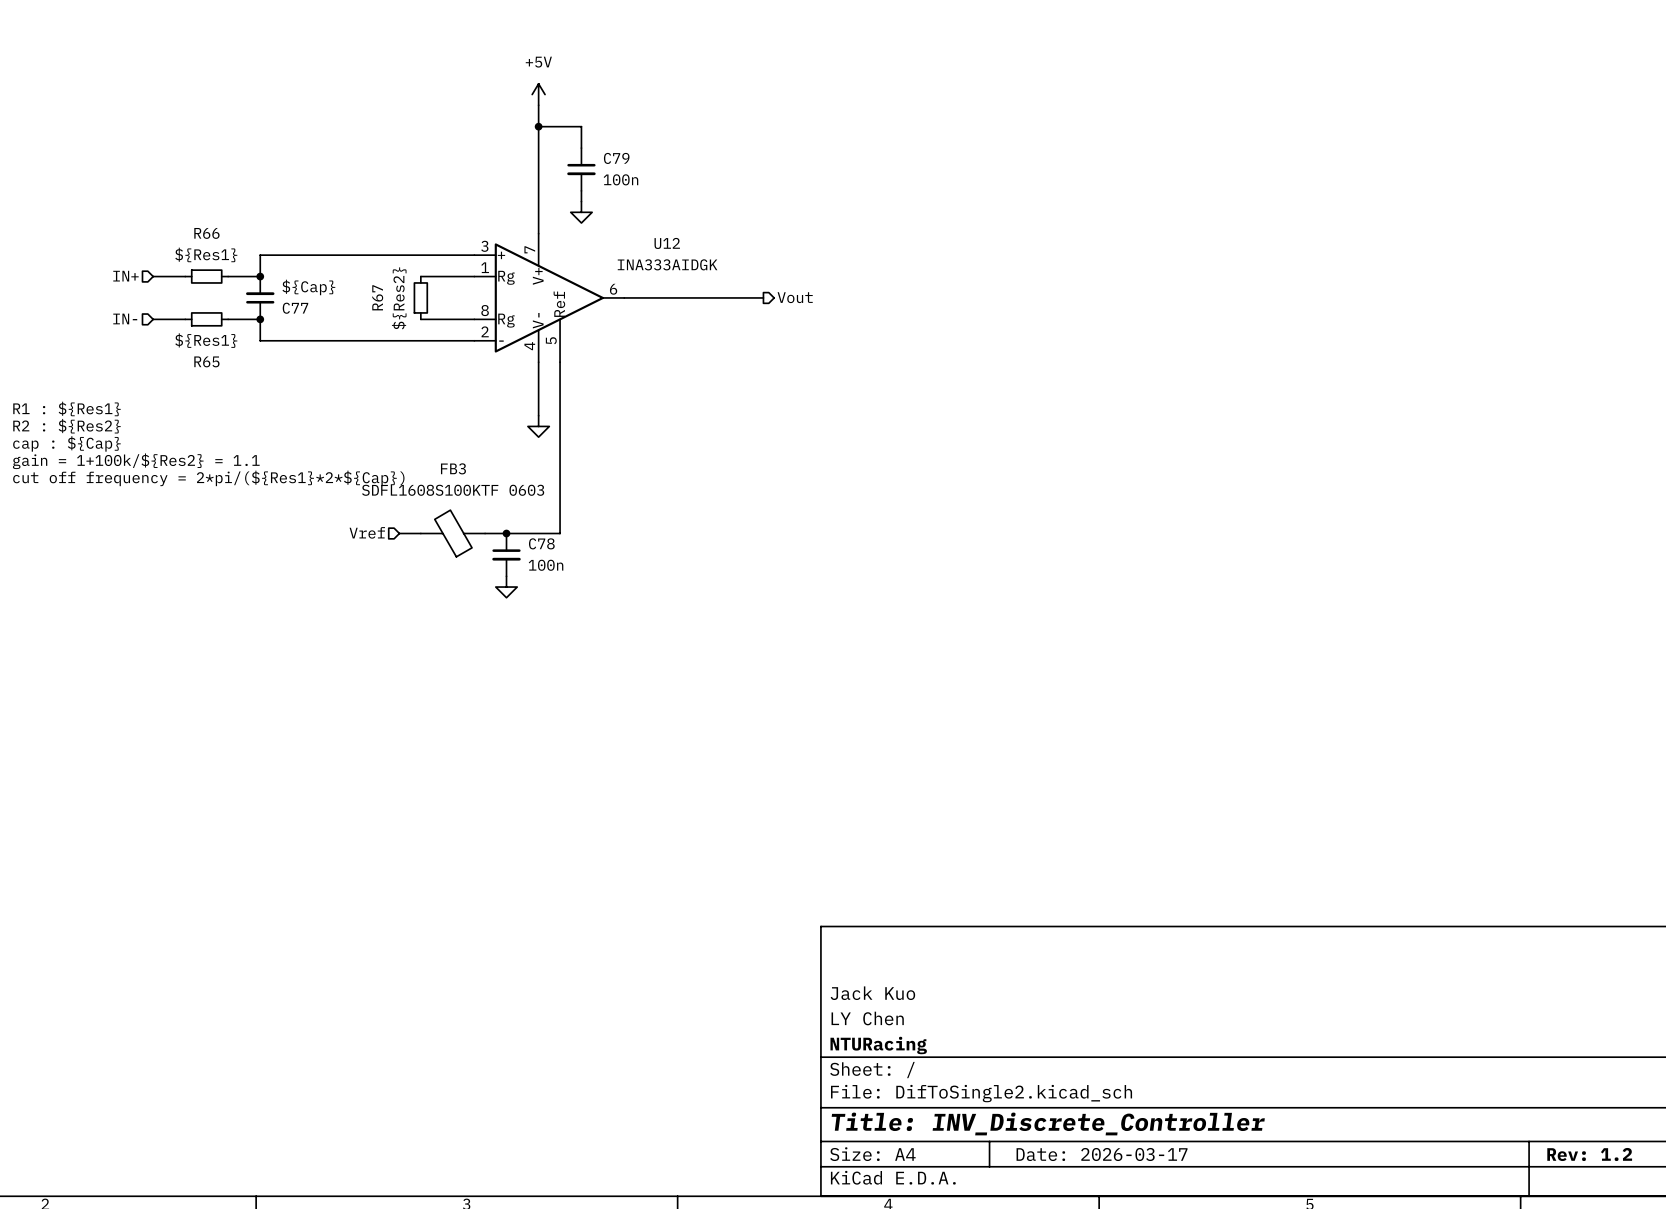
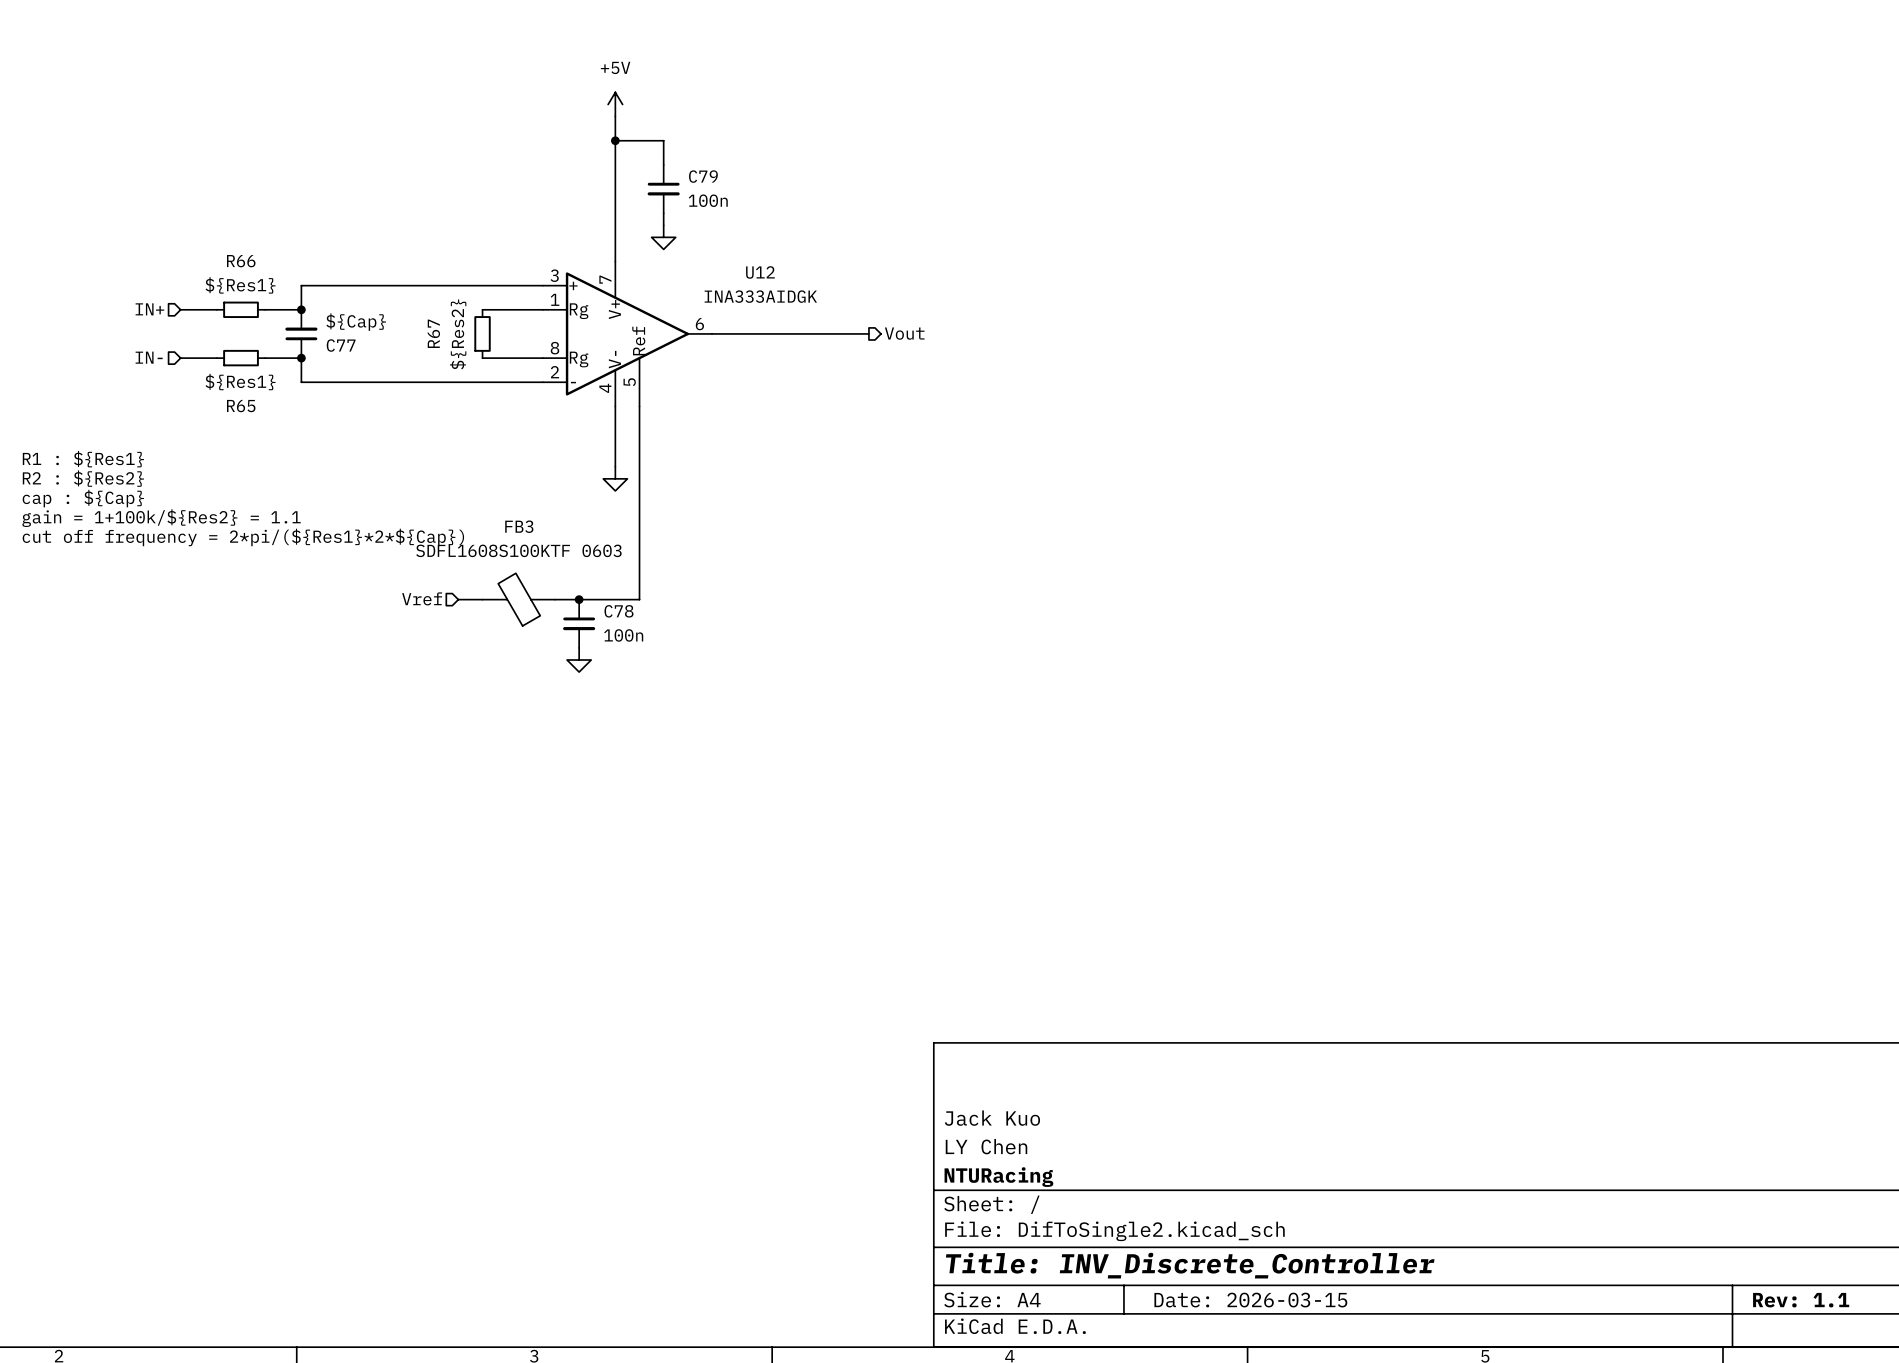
title block: Date: 2026-03-17 (1102, 1154) -> Date: 2026-03-15 (1250, 1300)
title block: Rev: 1.2 (1589, 1154) -> Rev: 1.1 (1801, 1300)

